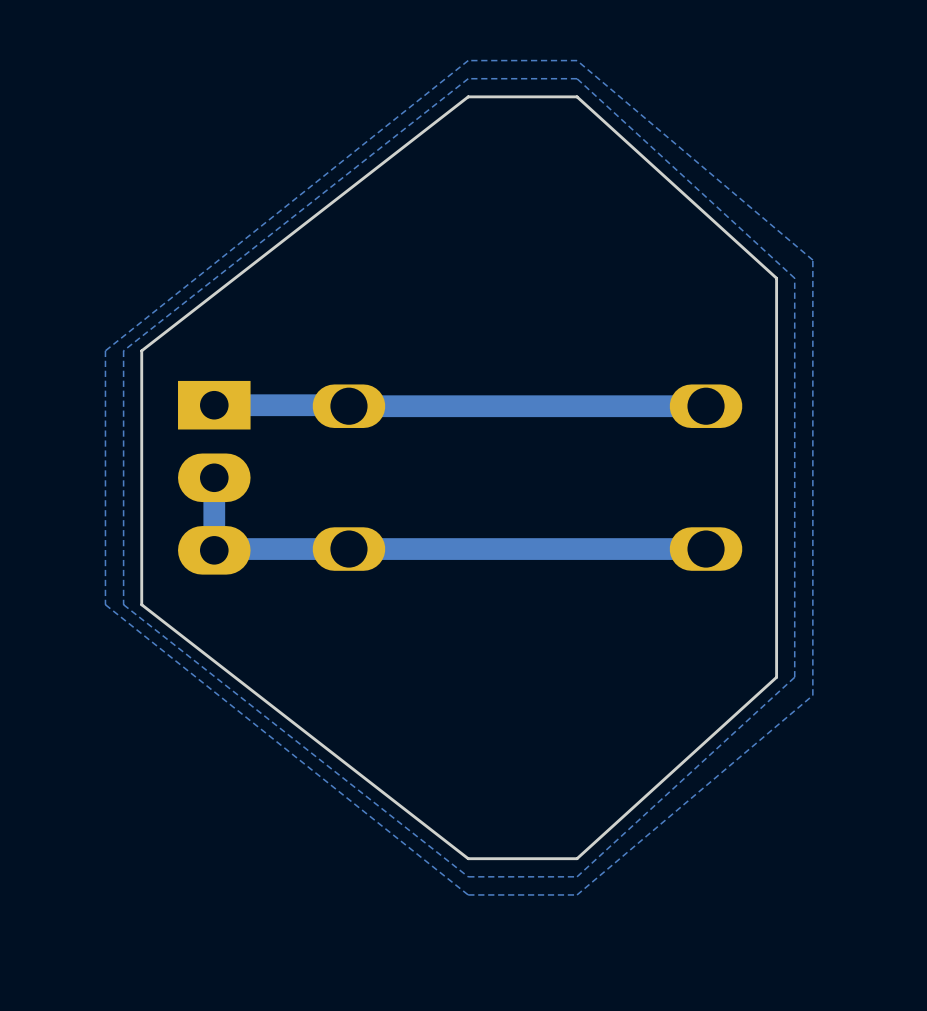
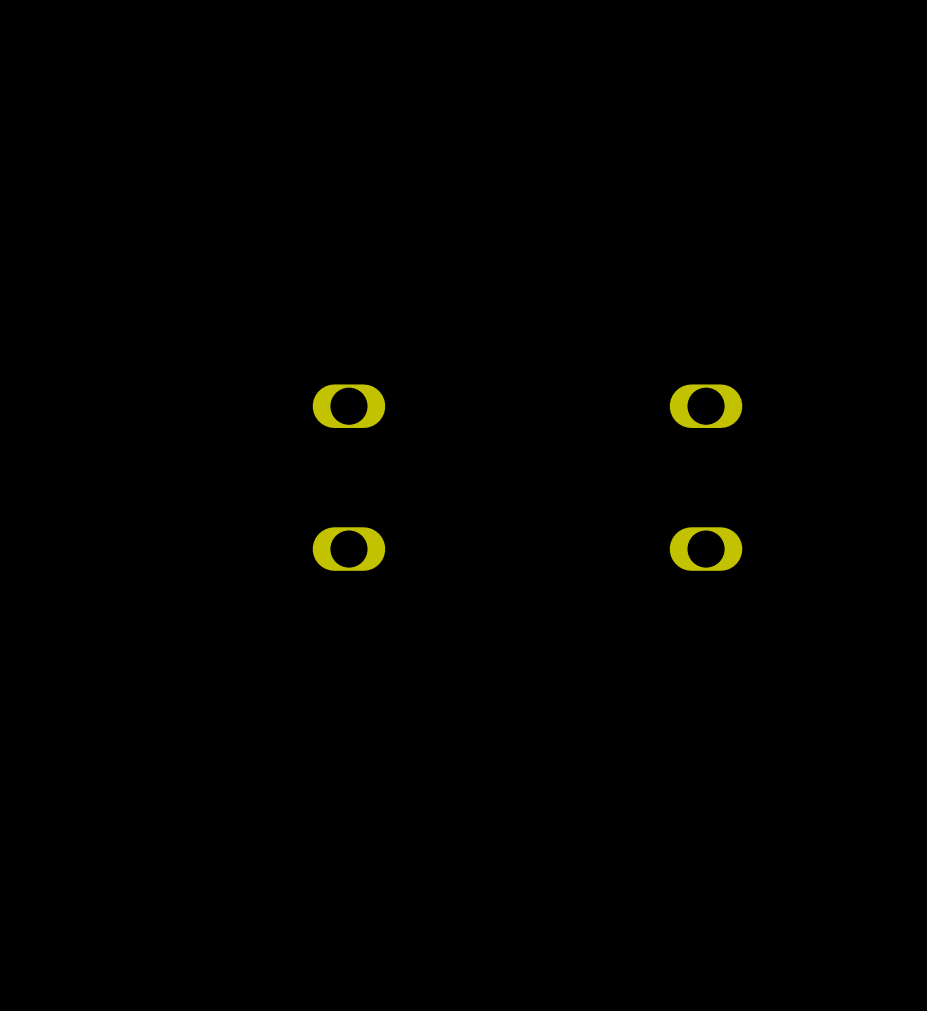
bottom zone outline: (577, 60) (812, 260) (812, 695) (577, 894) (468, 894) (105, 604) (105, 350) (468, 60) (577, 60) -> none
bottom zone outline: (577, 78) (794, 278) (794, 677) (577, 876) (468, 876) (123, 604) (123, 350) (468, 78) (577, 78) -> none
board edge: (577, 96) (468, 96) (141, 350) (141, 604) (468, 858) (577, 858) (776, 677) (776, 278) (577, 96) -> none
bottom track: (214, 405) (706, 406) -> none
bottom track: (214, 477) (213, 549) (706, 549) -> none
part: (214, 477) -> none

